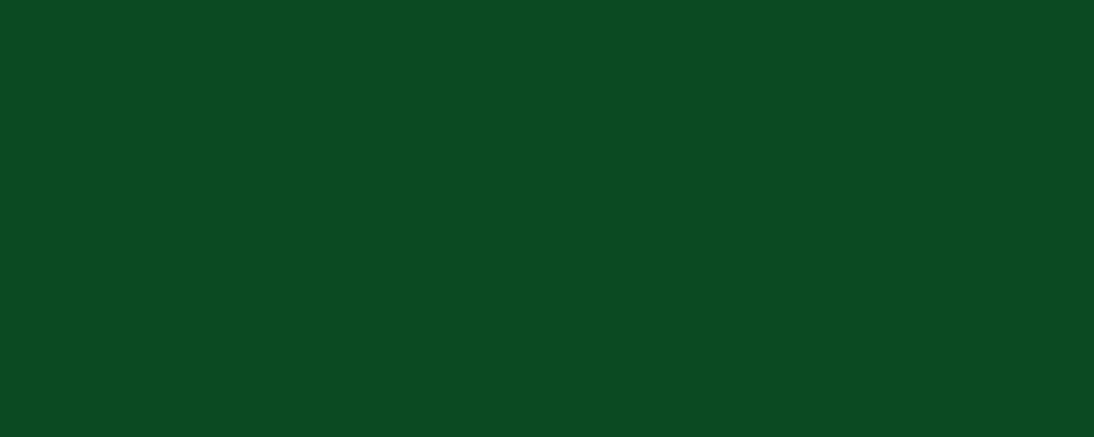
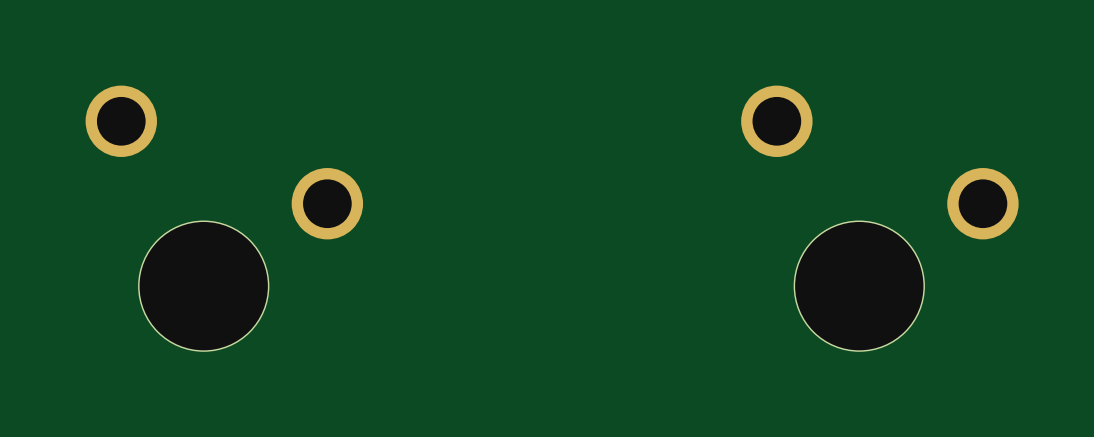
part: none -> (224, 218)
part: none -> (879, 218)

